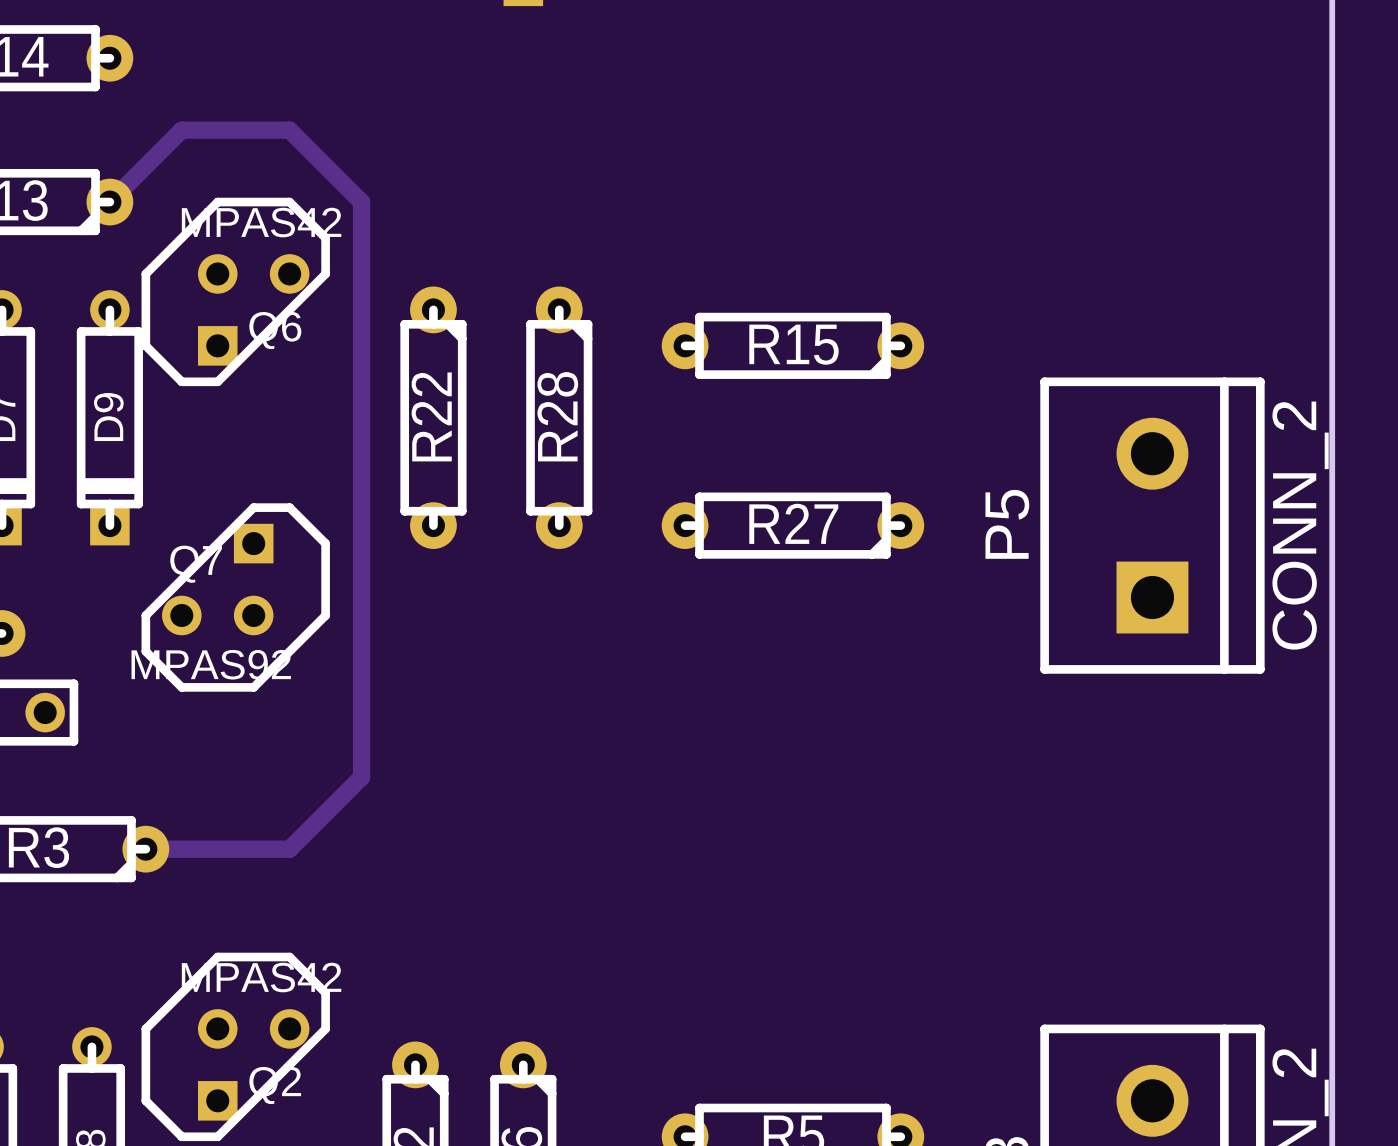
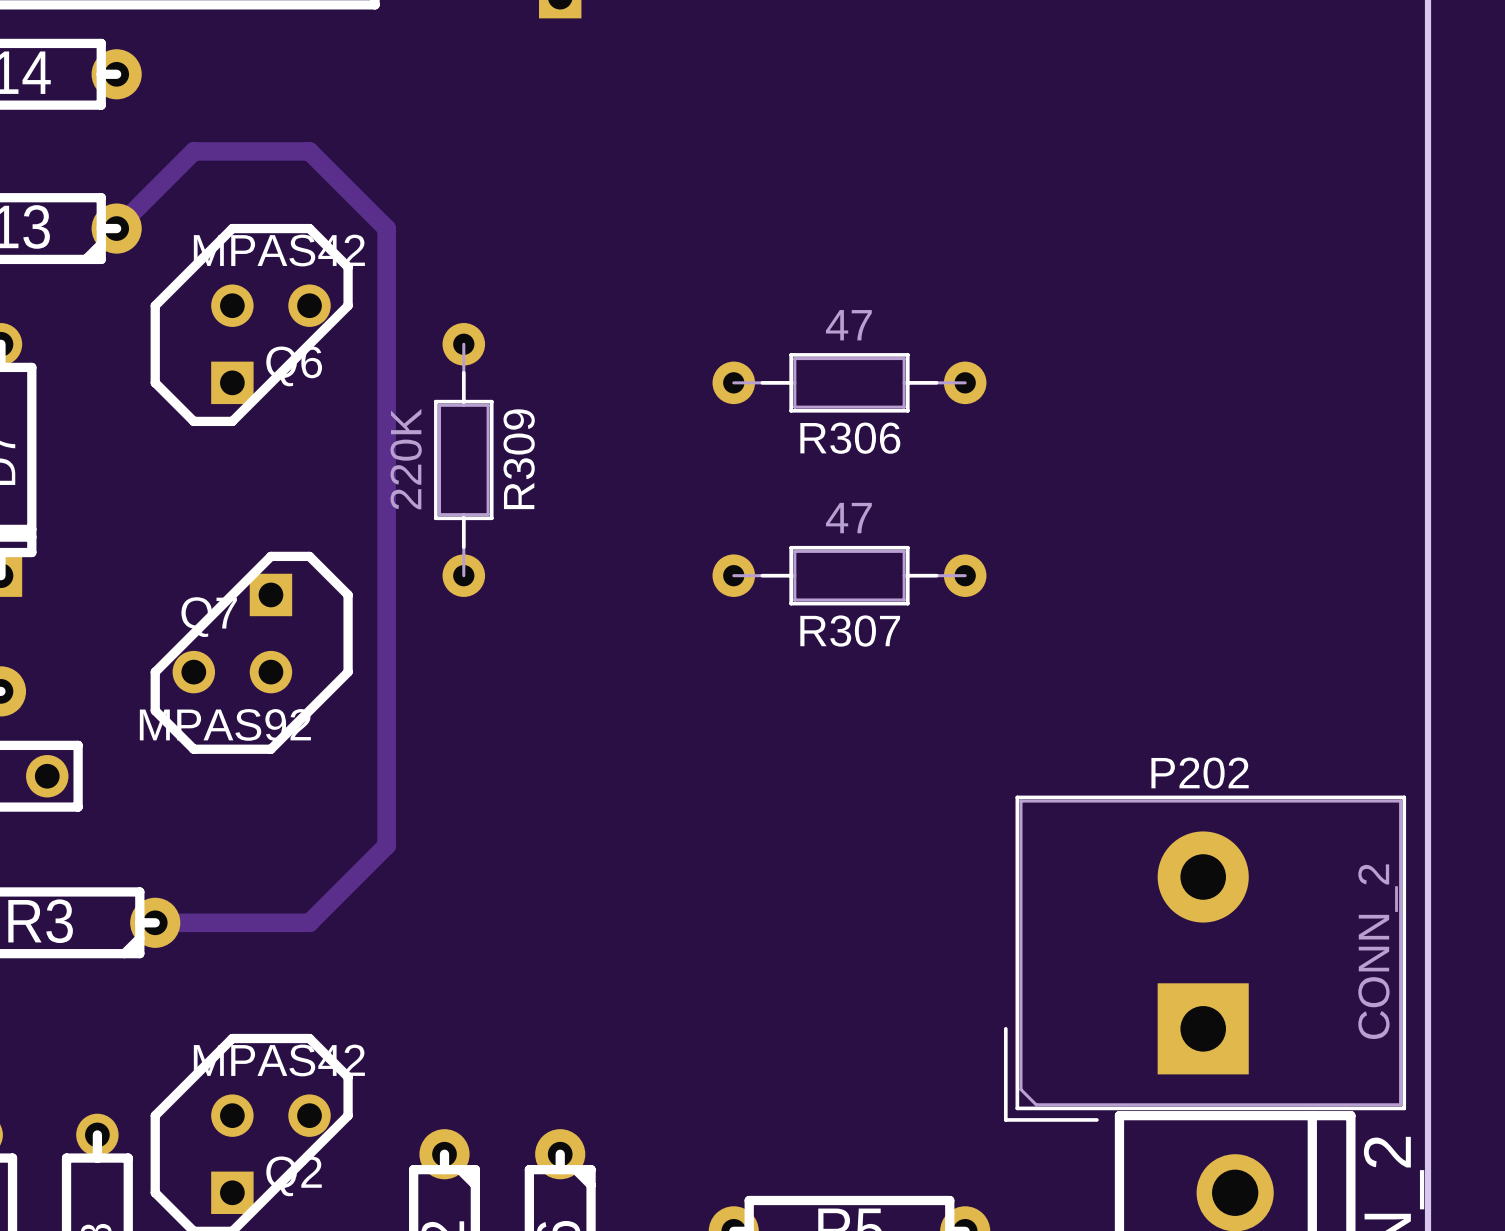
R15: (792, 345) -> none
R306: none -> 47 (849, 382)
D9: (109, 417) -> none
R22: (433, 417) -> none
R309: none -> 220K (463, 459)
R28: (559, 417) -> none
R27: (792, 525) -> none
R307: none -> 47 (849, 575)
P5: CONN_2 (1152, 525) -> none
P202: none -> CONN_2 (1205, 958)

